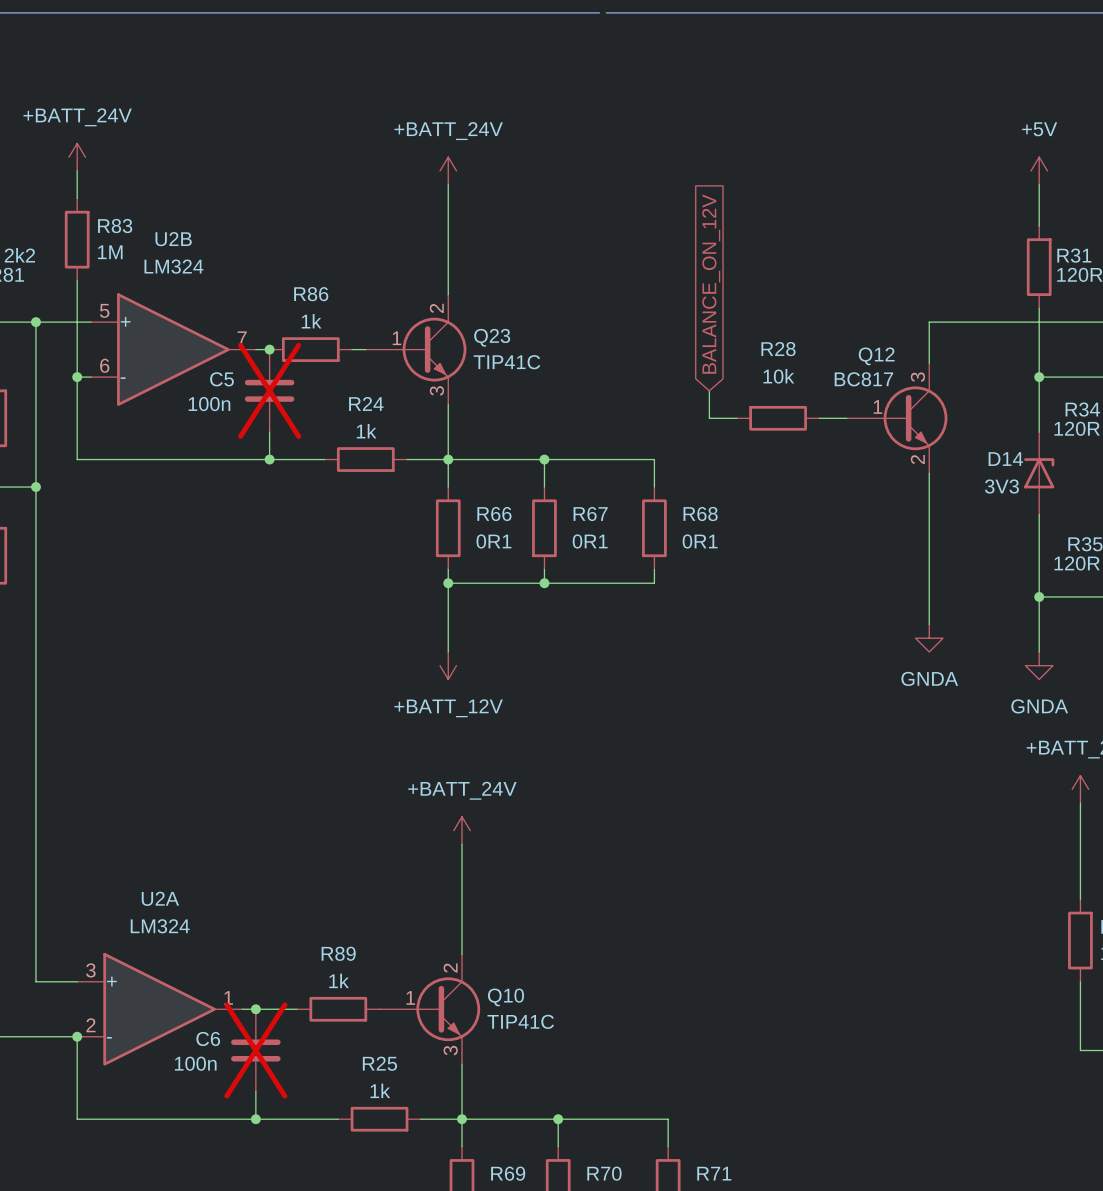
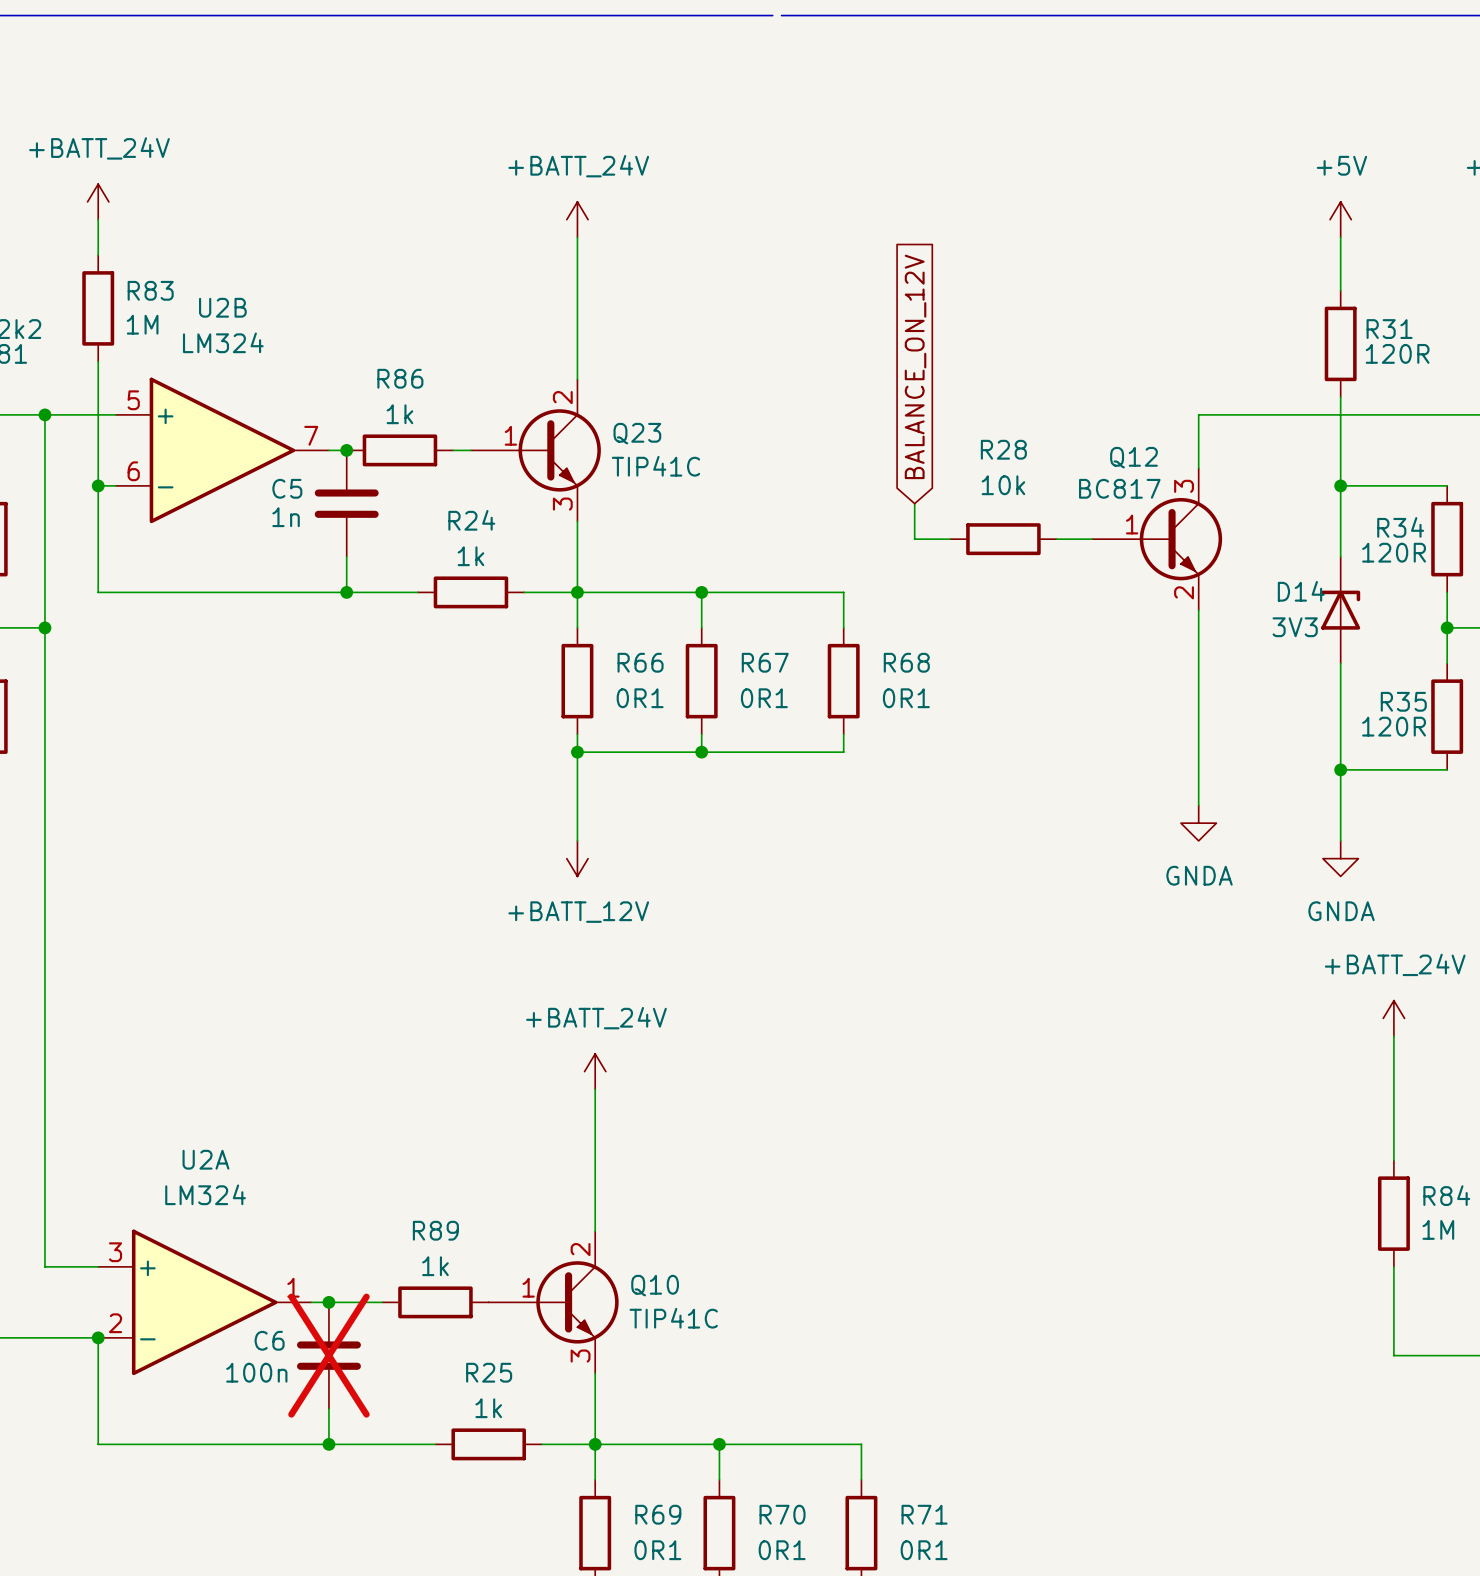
C5 do-not-place cross: (269, 390) -> none
C5 value: 100n (209, 404) -> 1n (286, 517)

